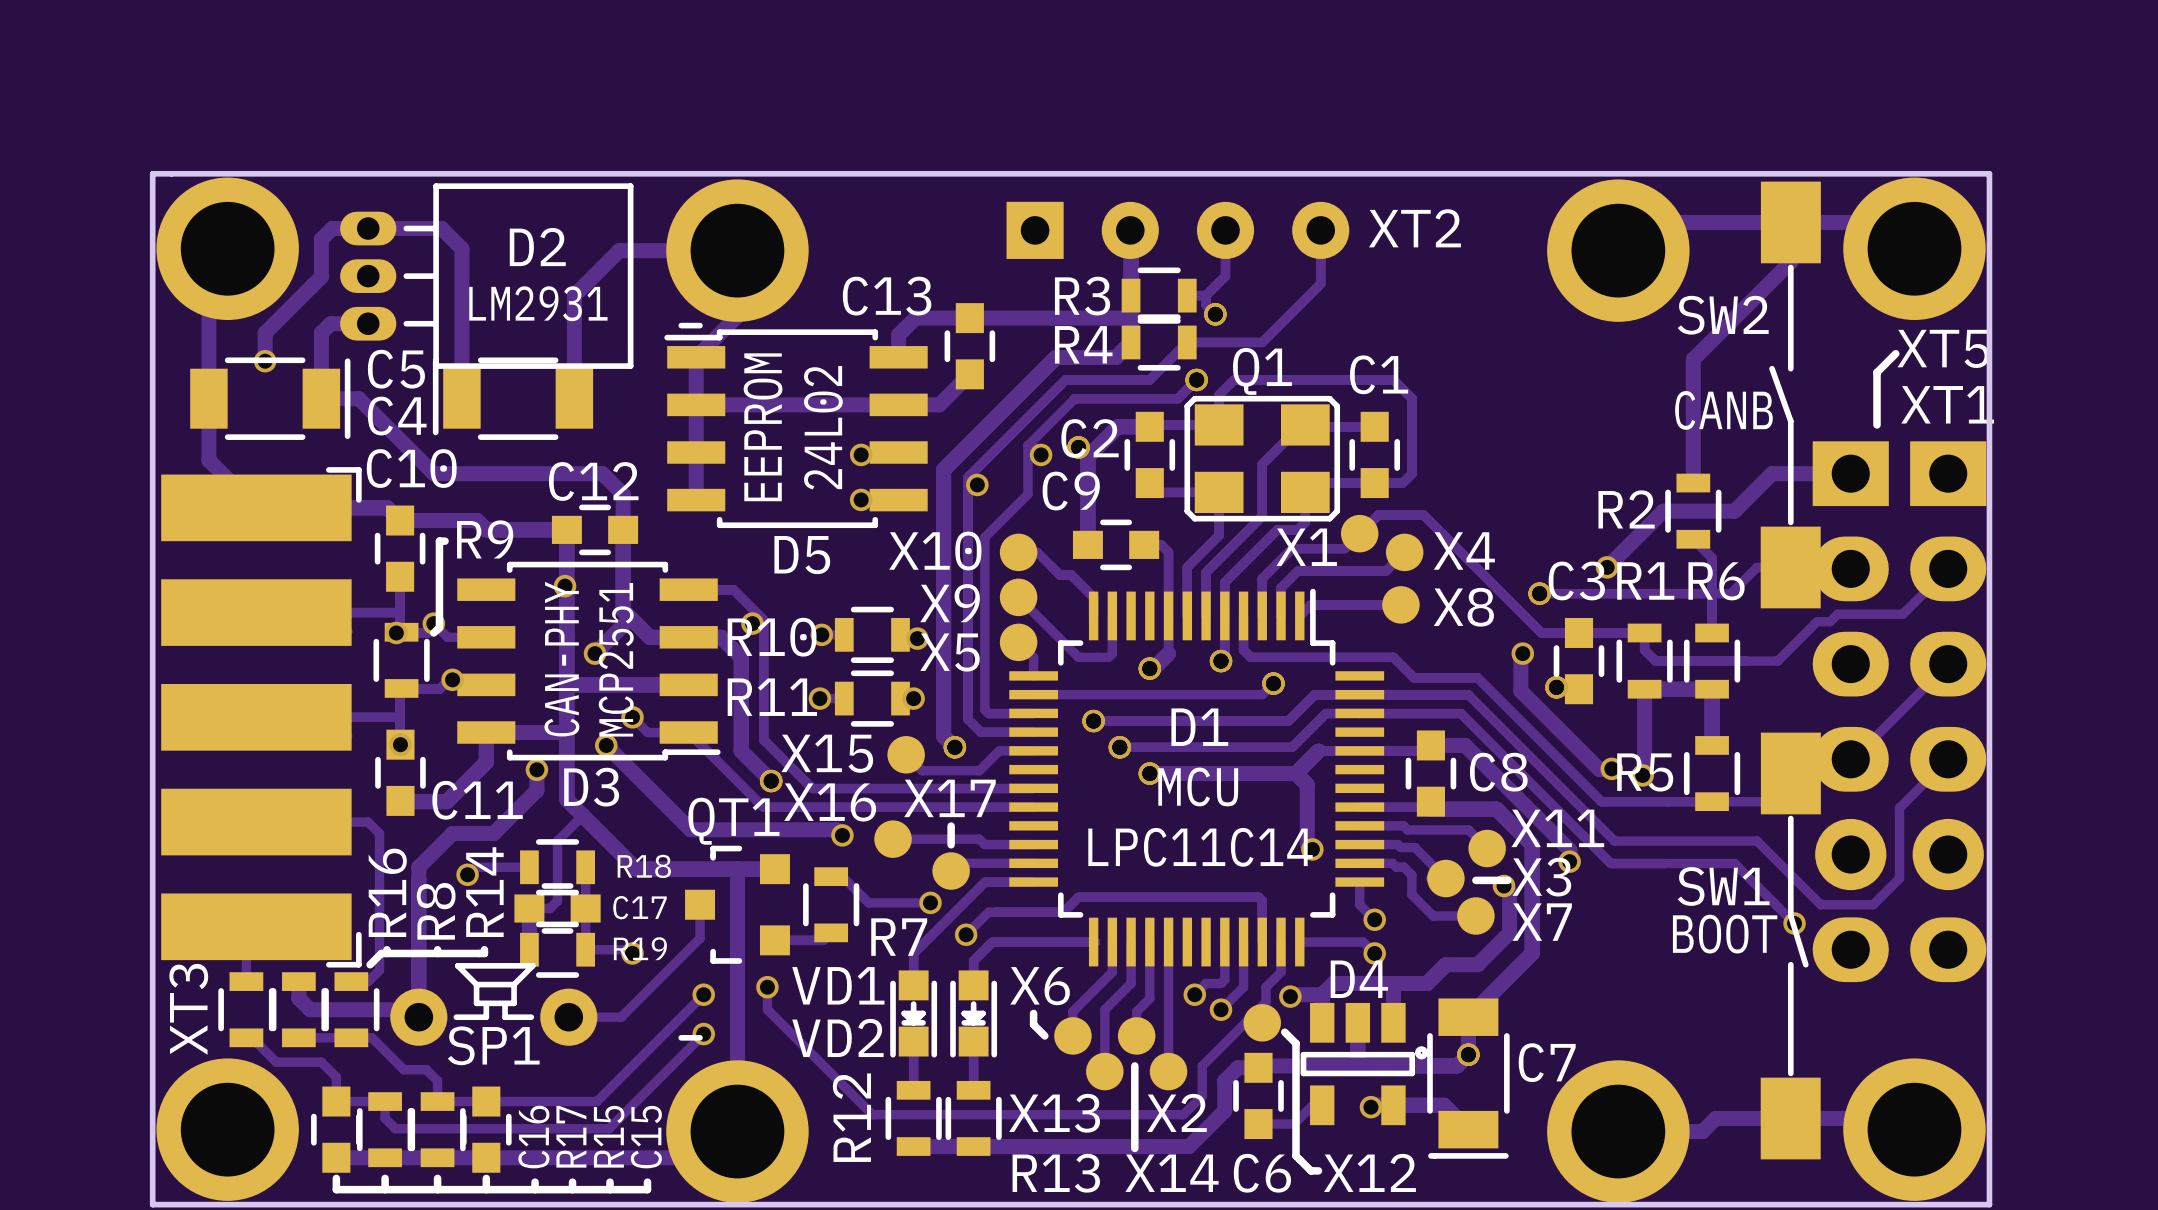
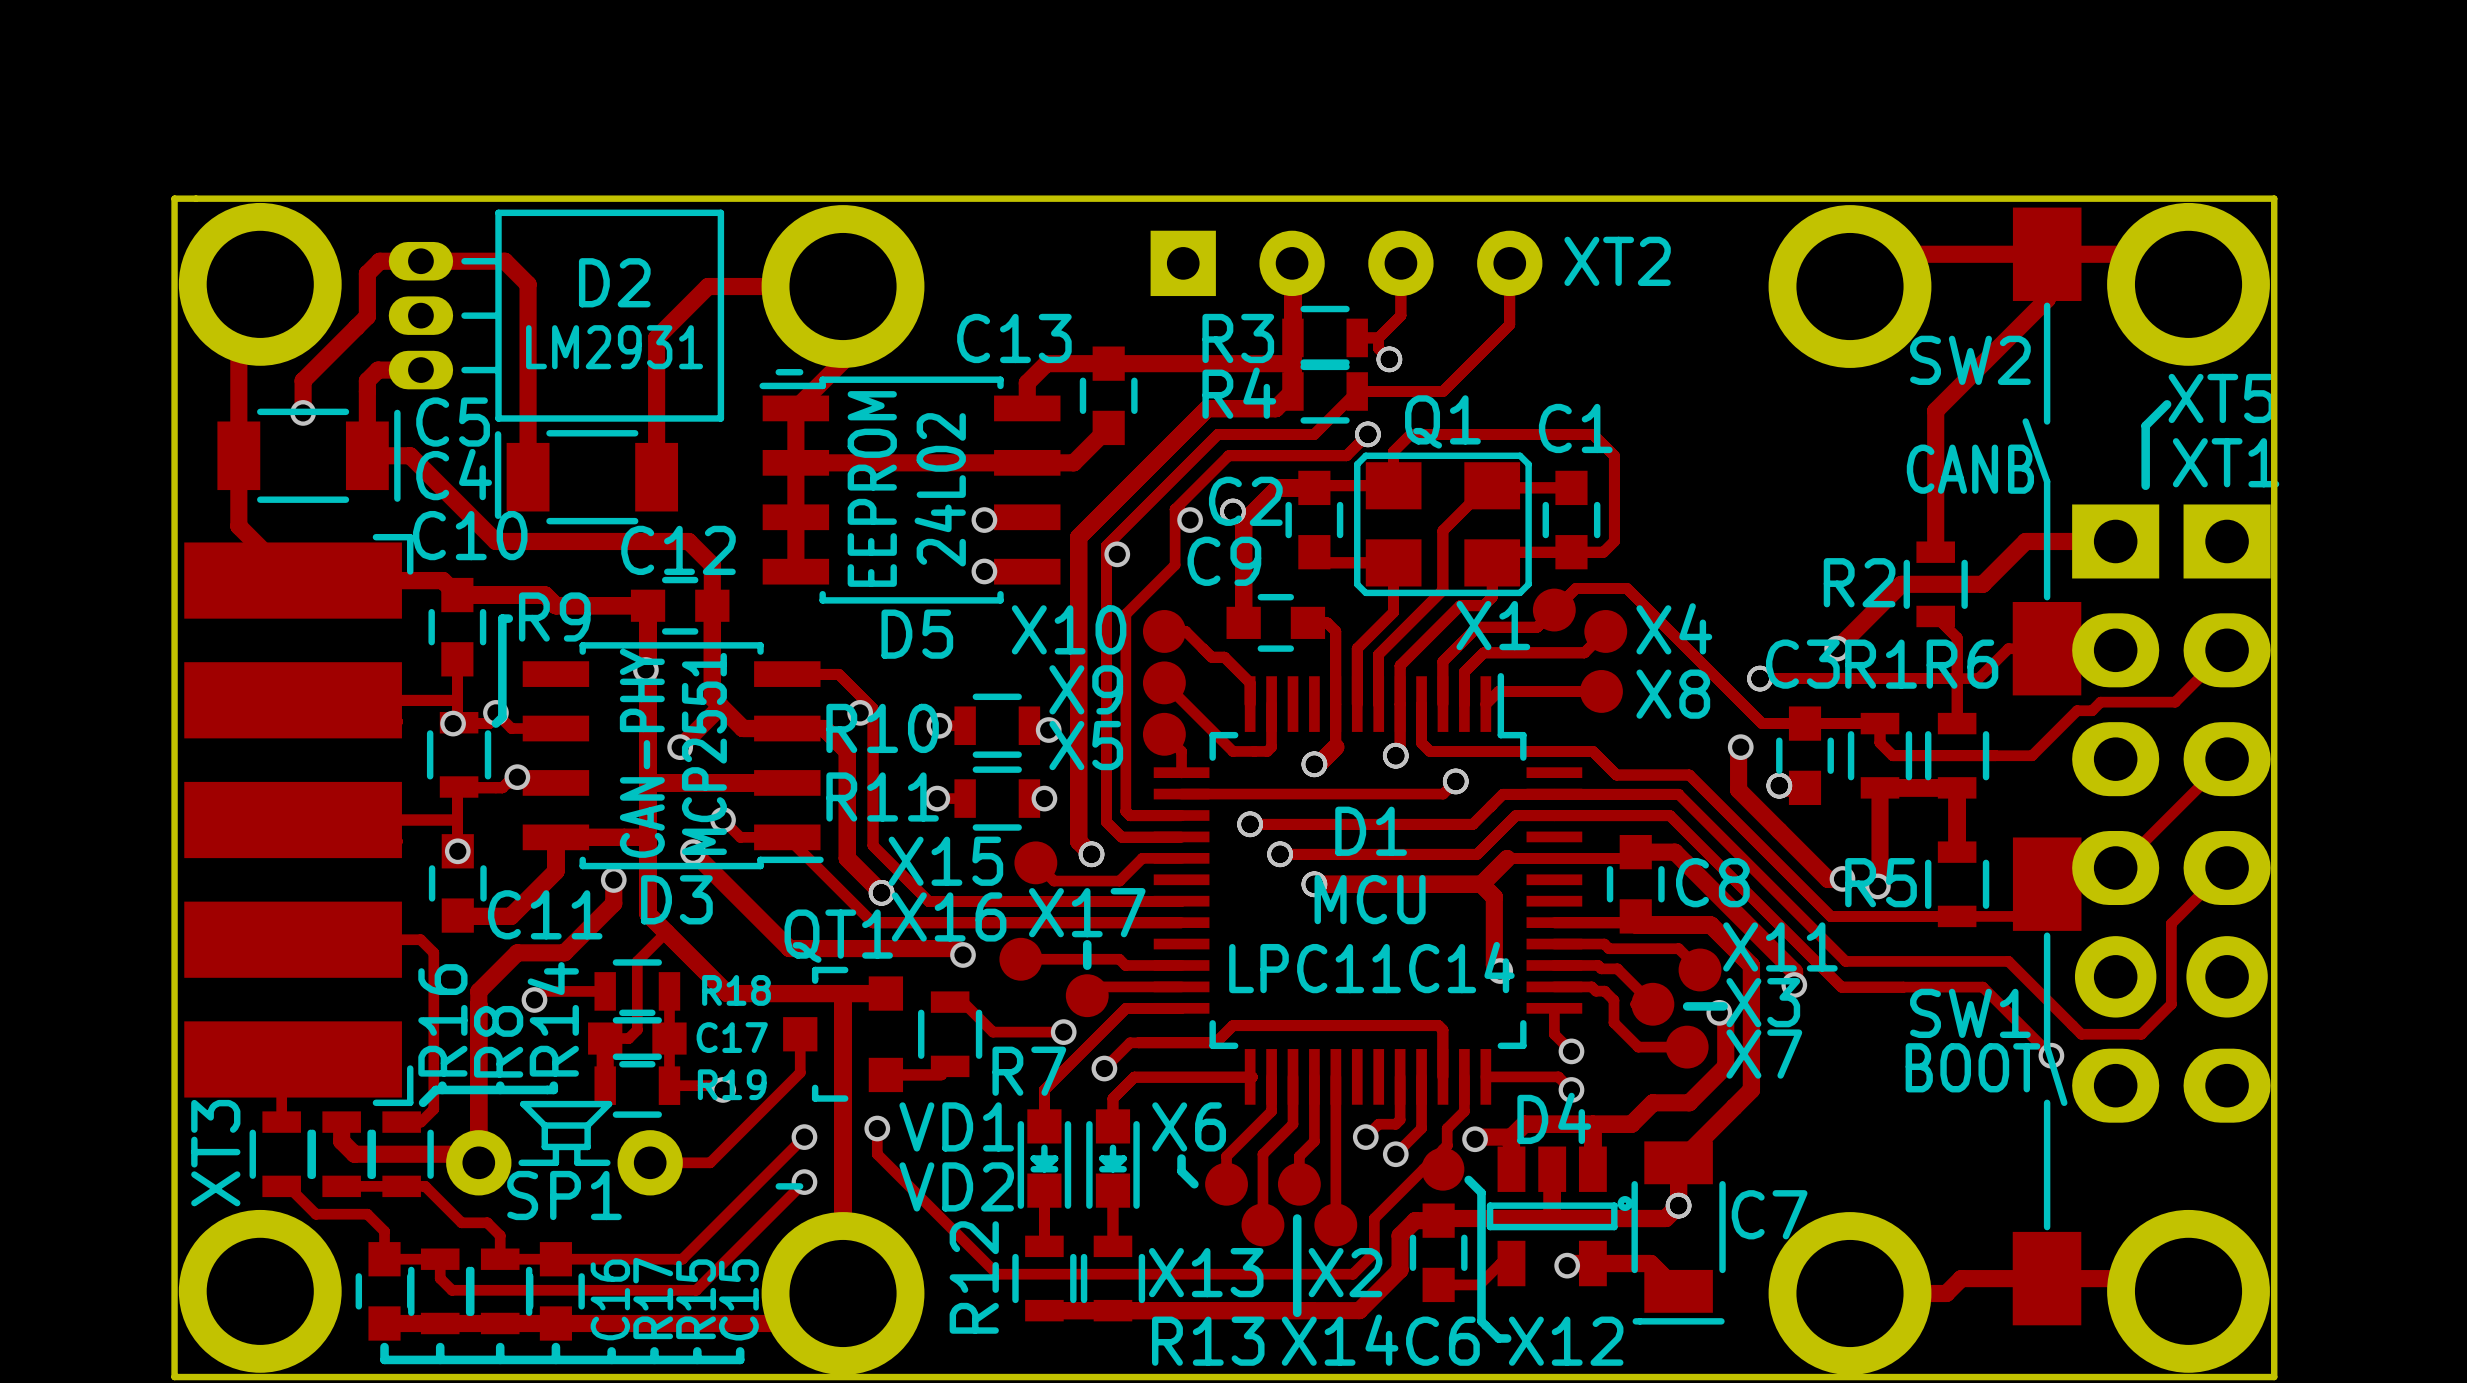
C4 position: (513, 398) -> (586, 477)

